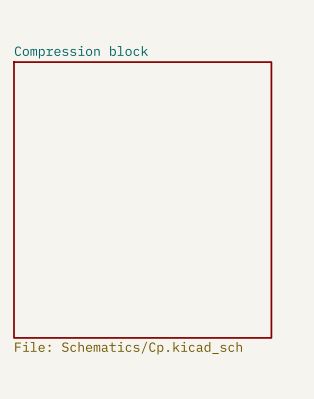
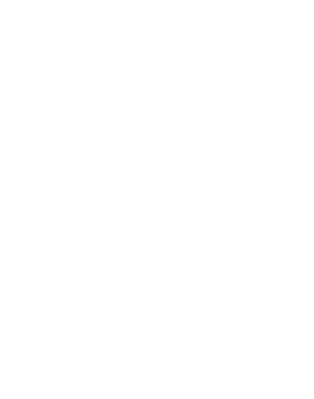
sheet Compression block: File: Schematics/Cp.kicad_sch (142, 200) -> none

